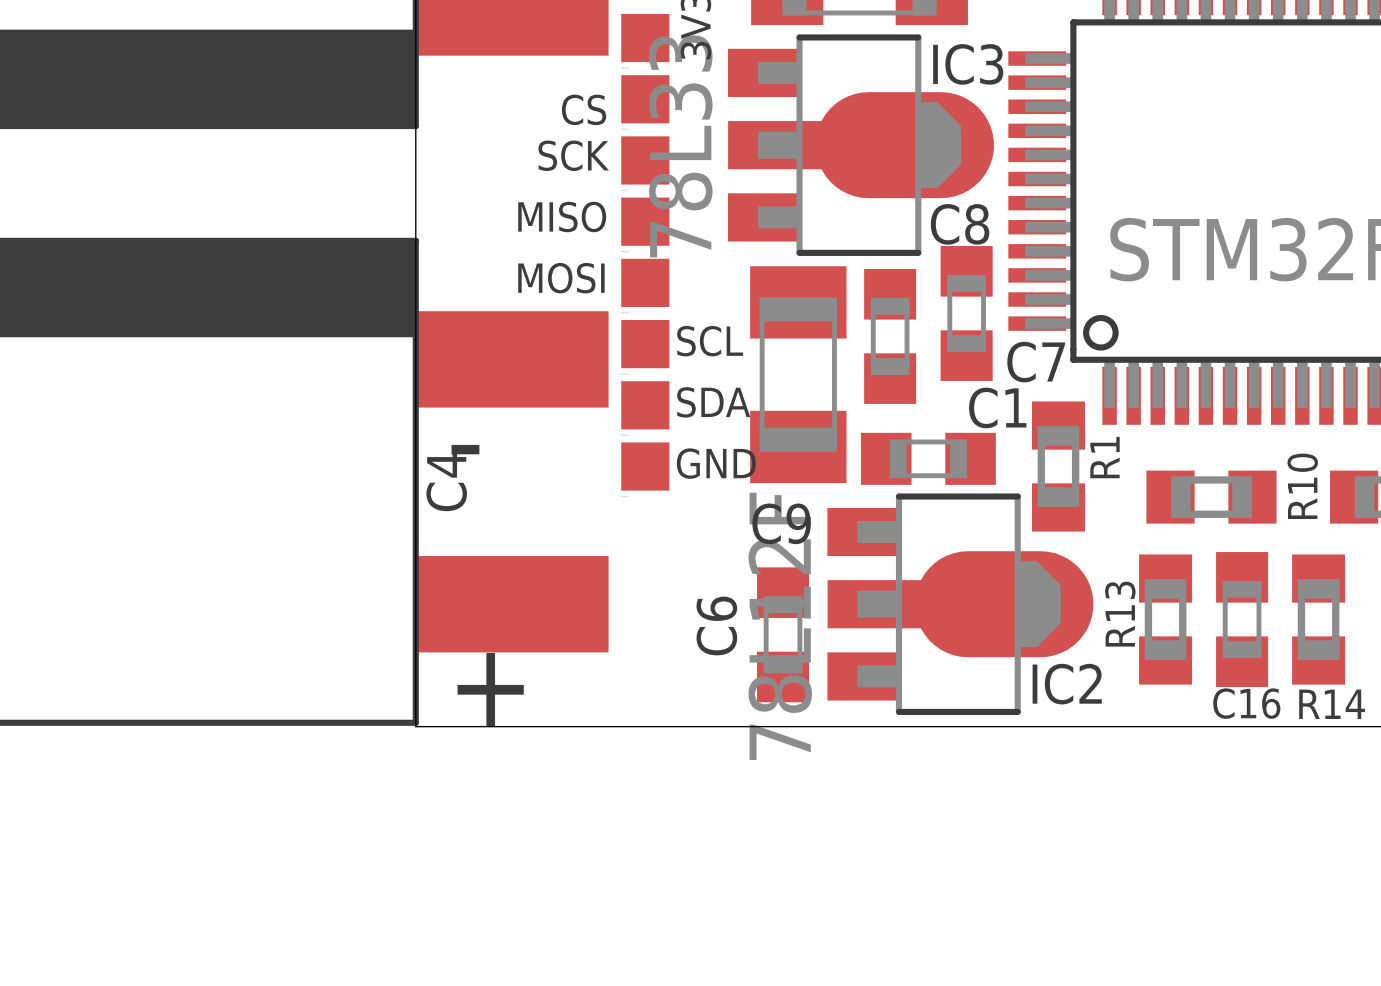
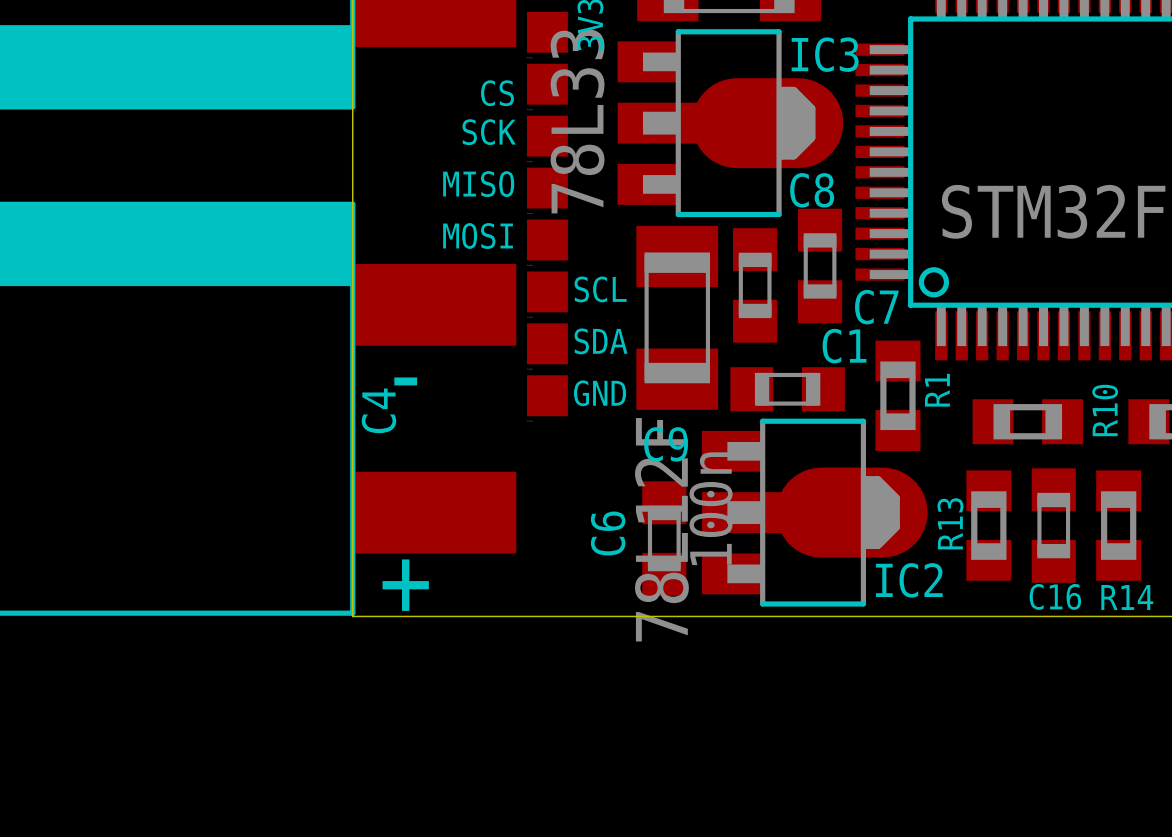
C6 value: none -> 100n (711, 508)

